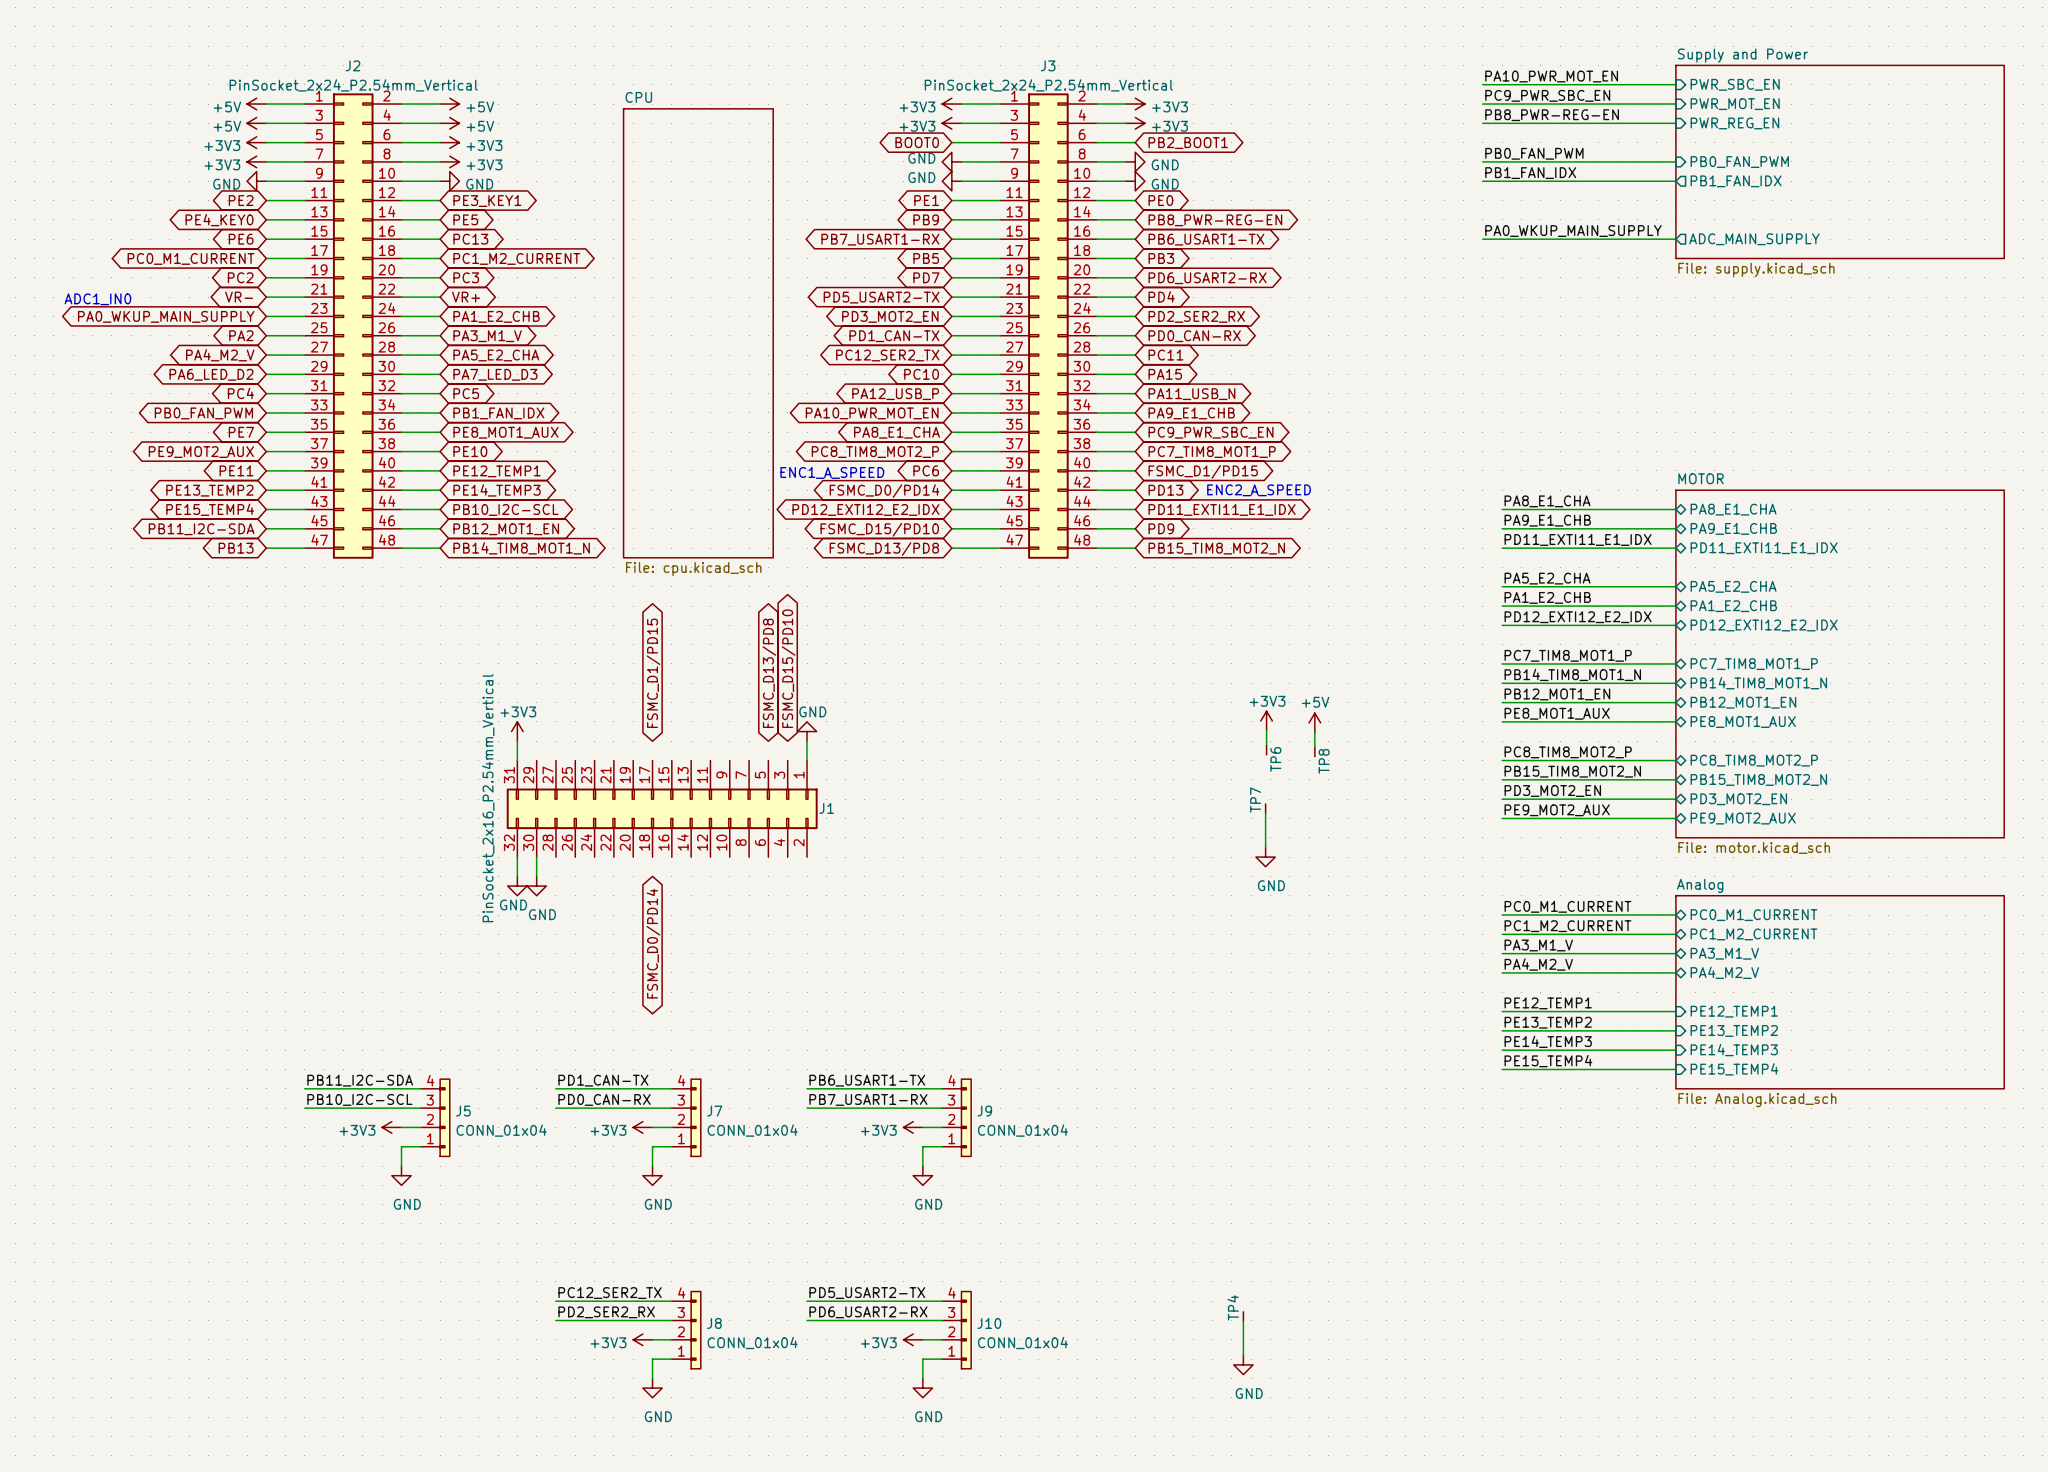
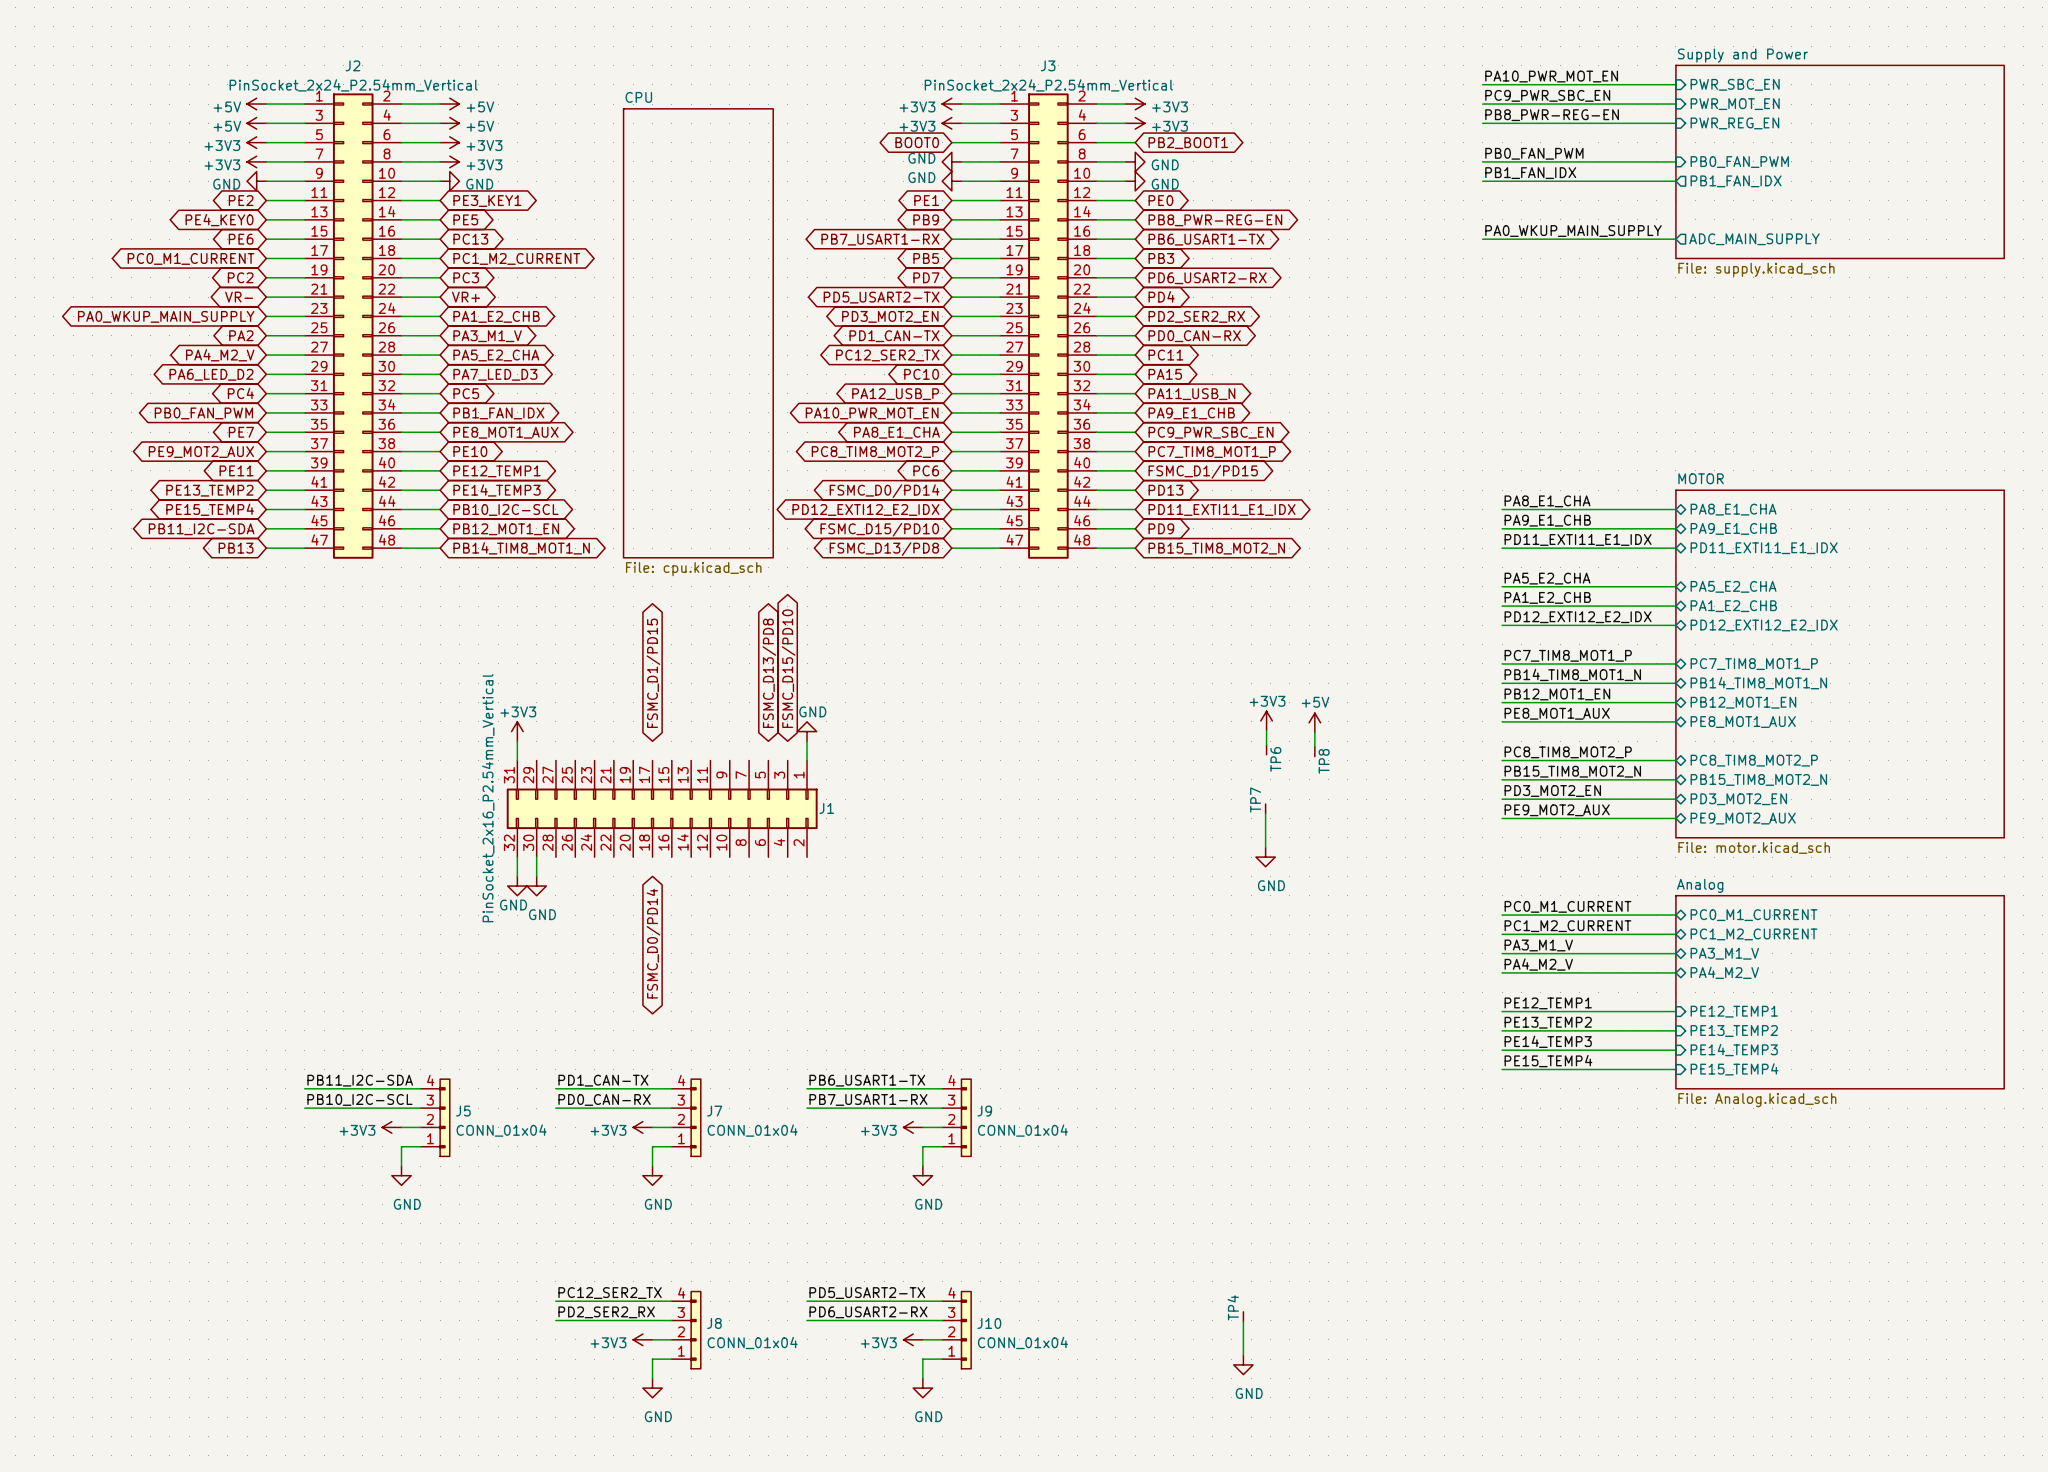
text: ADC1_IN0 (97, 299) -> none
text: ENC1_A_SPEED (832, 472) -> none
text: ENC2_A_SPEED (1259, 490) -> none

